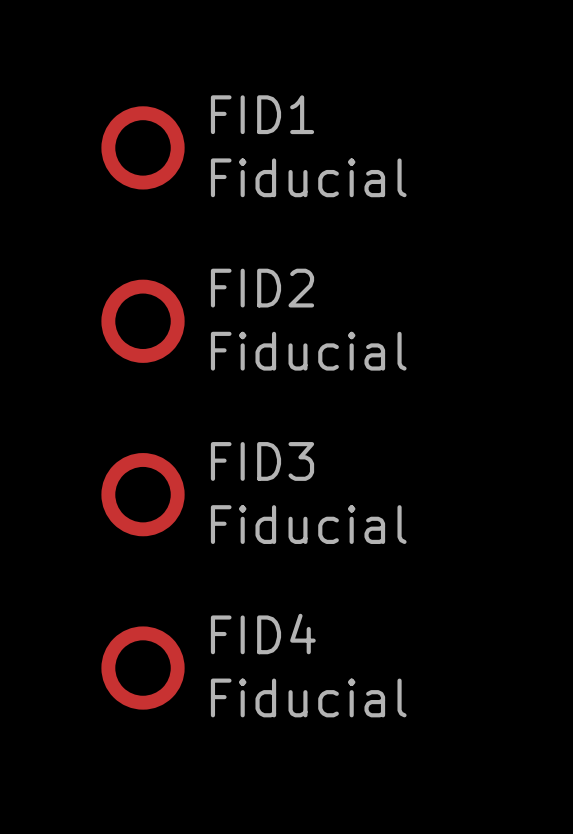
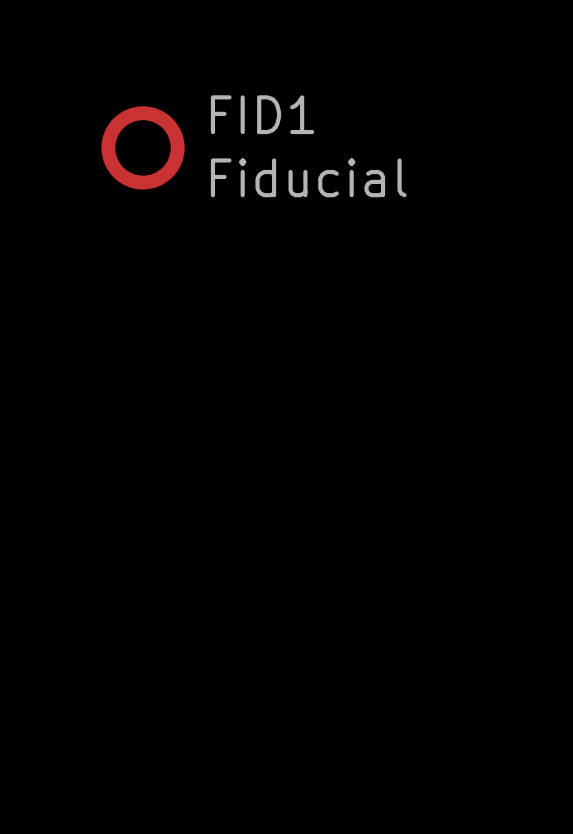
FID2: Fiducial (143, 321) -> none
FID3: Fiducial (143, 494) -> none
FID4: Fiducial (143, 668) -> none

